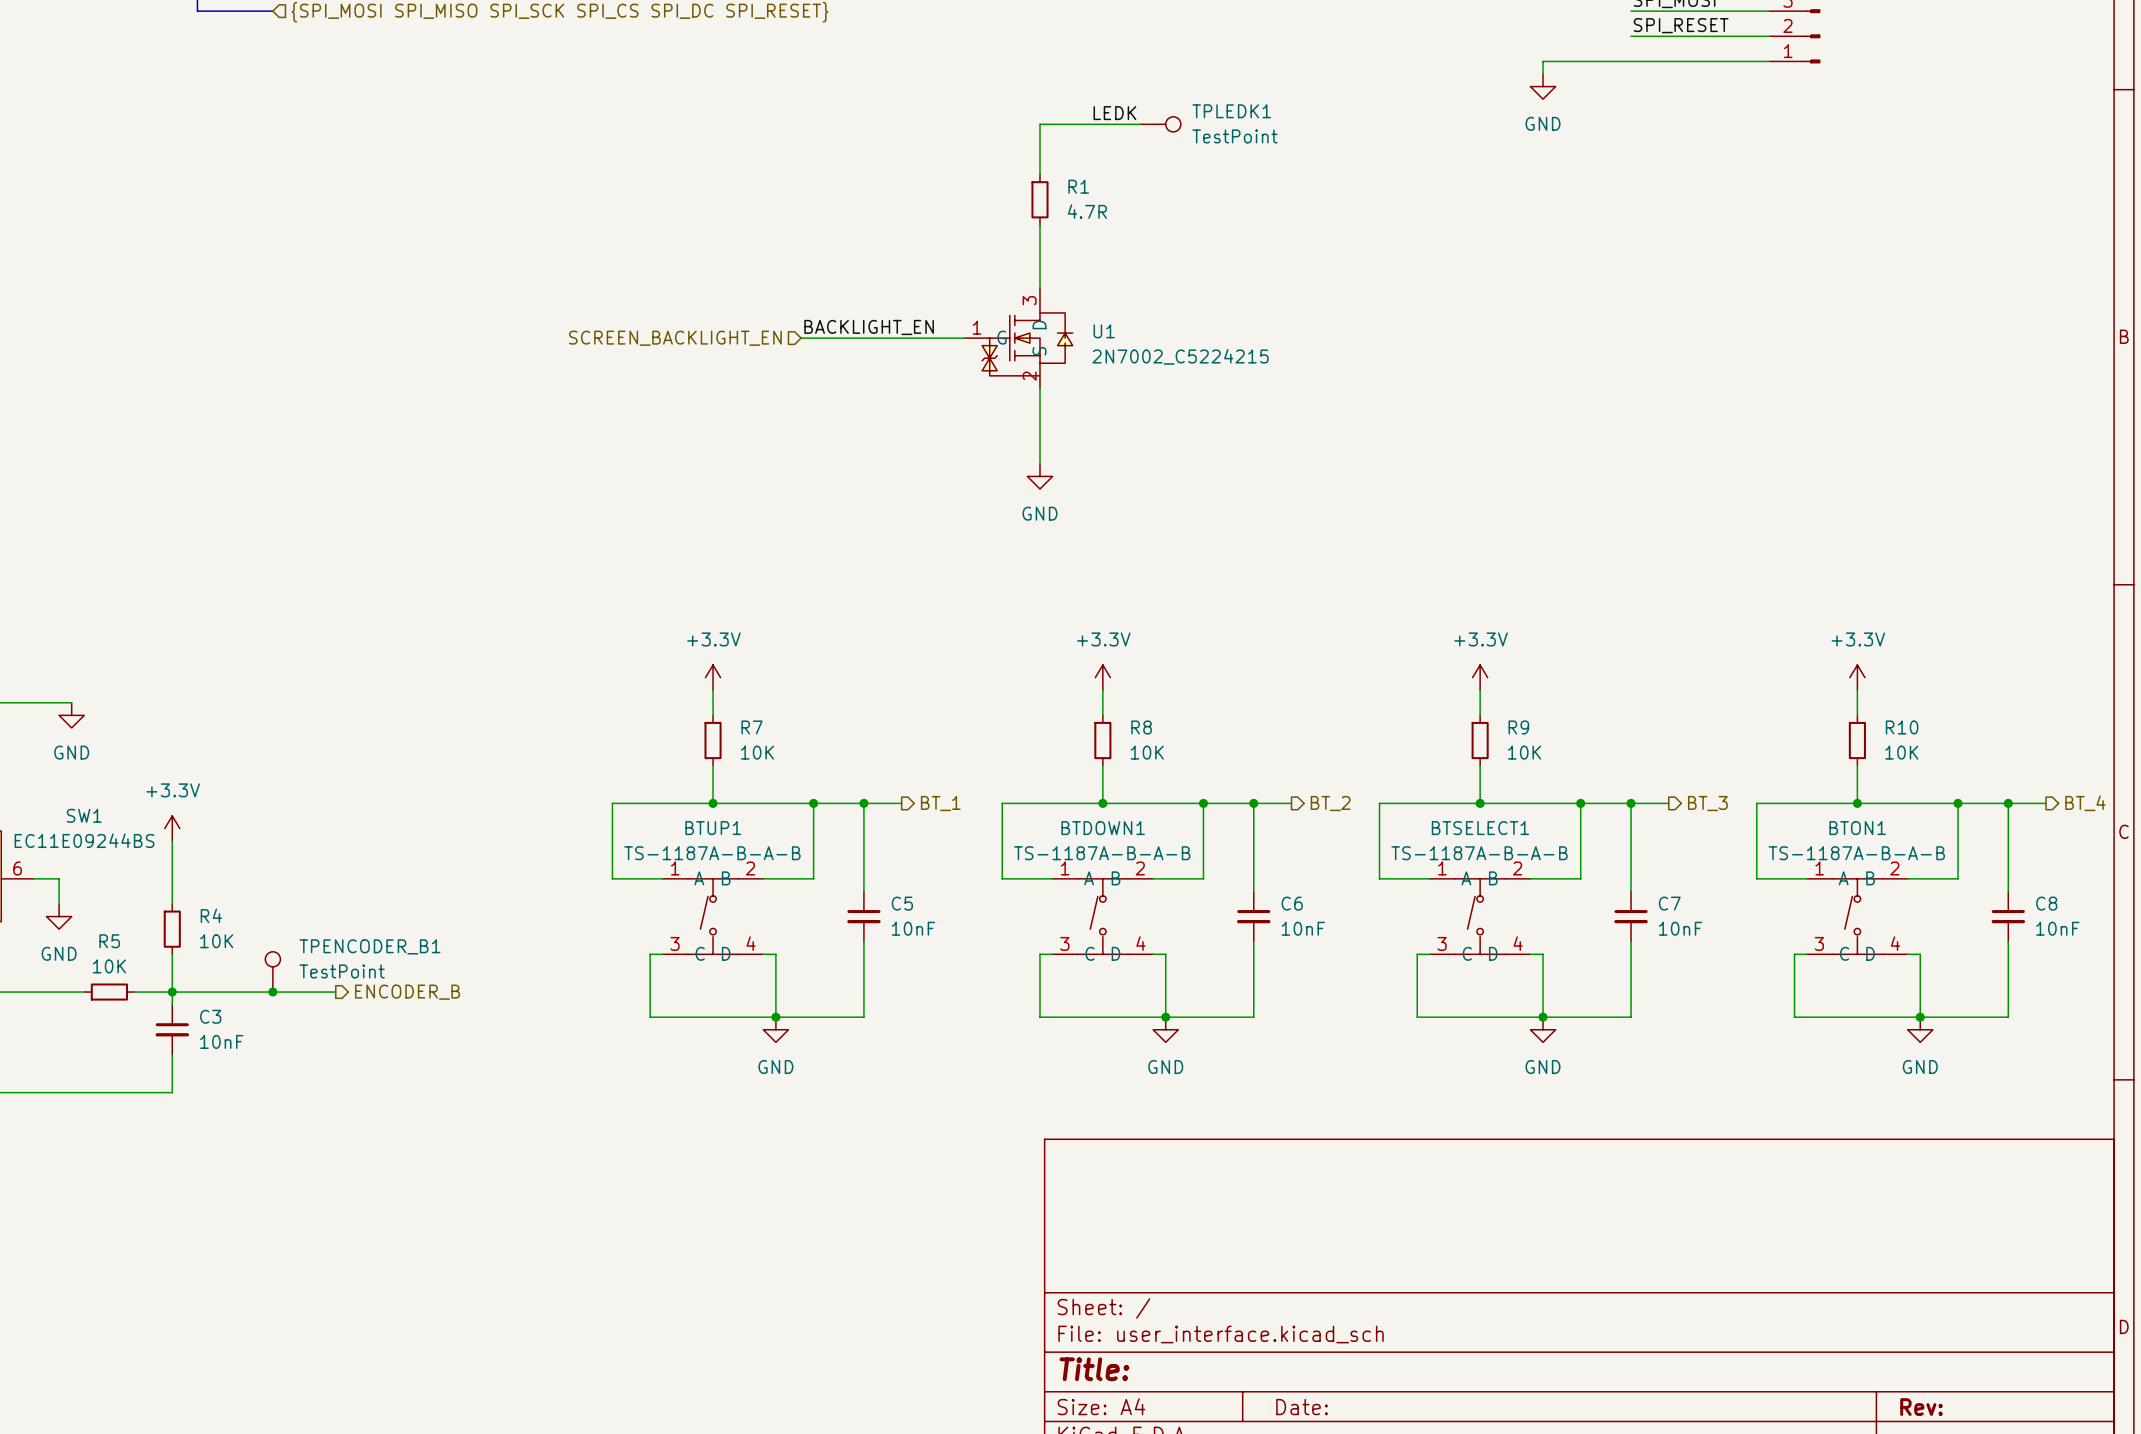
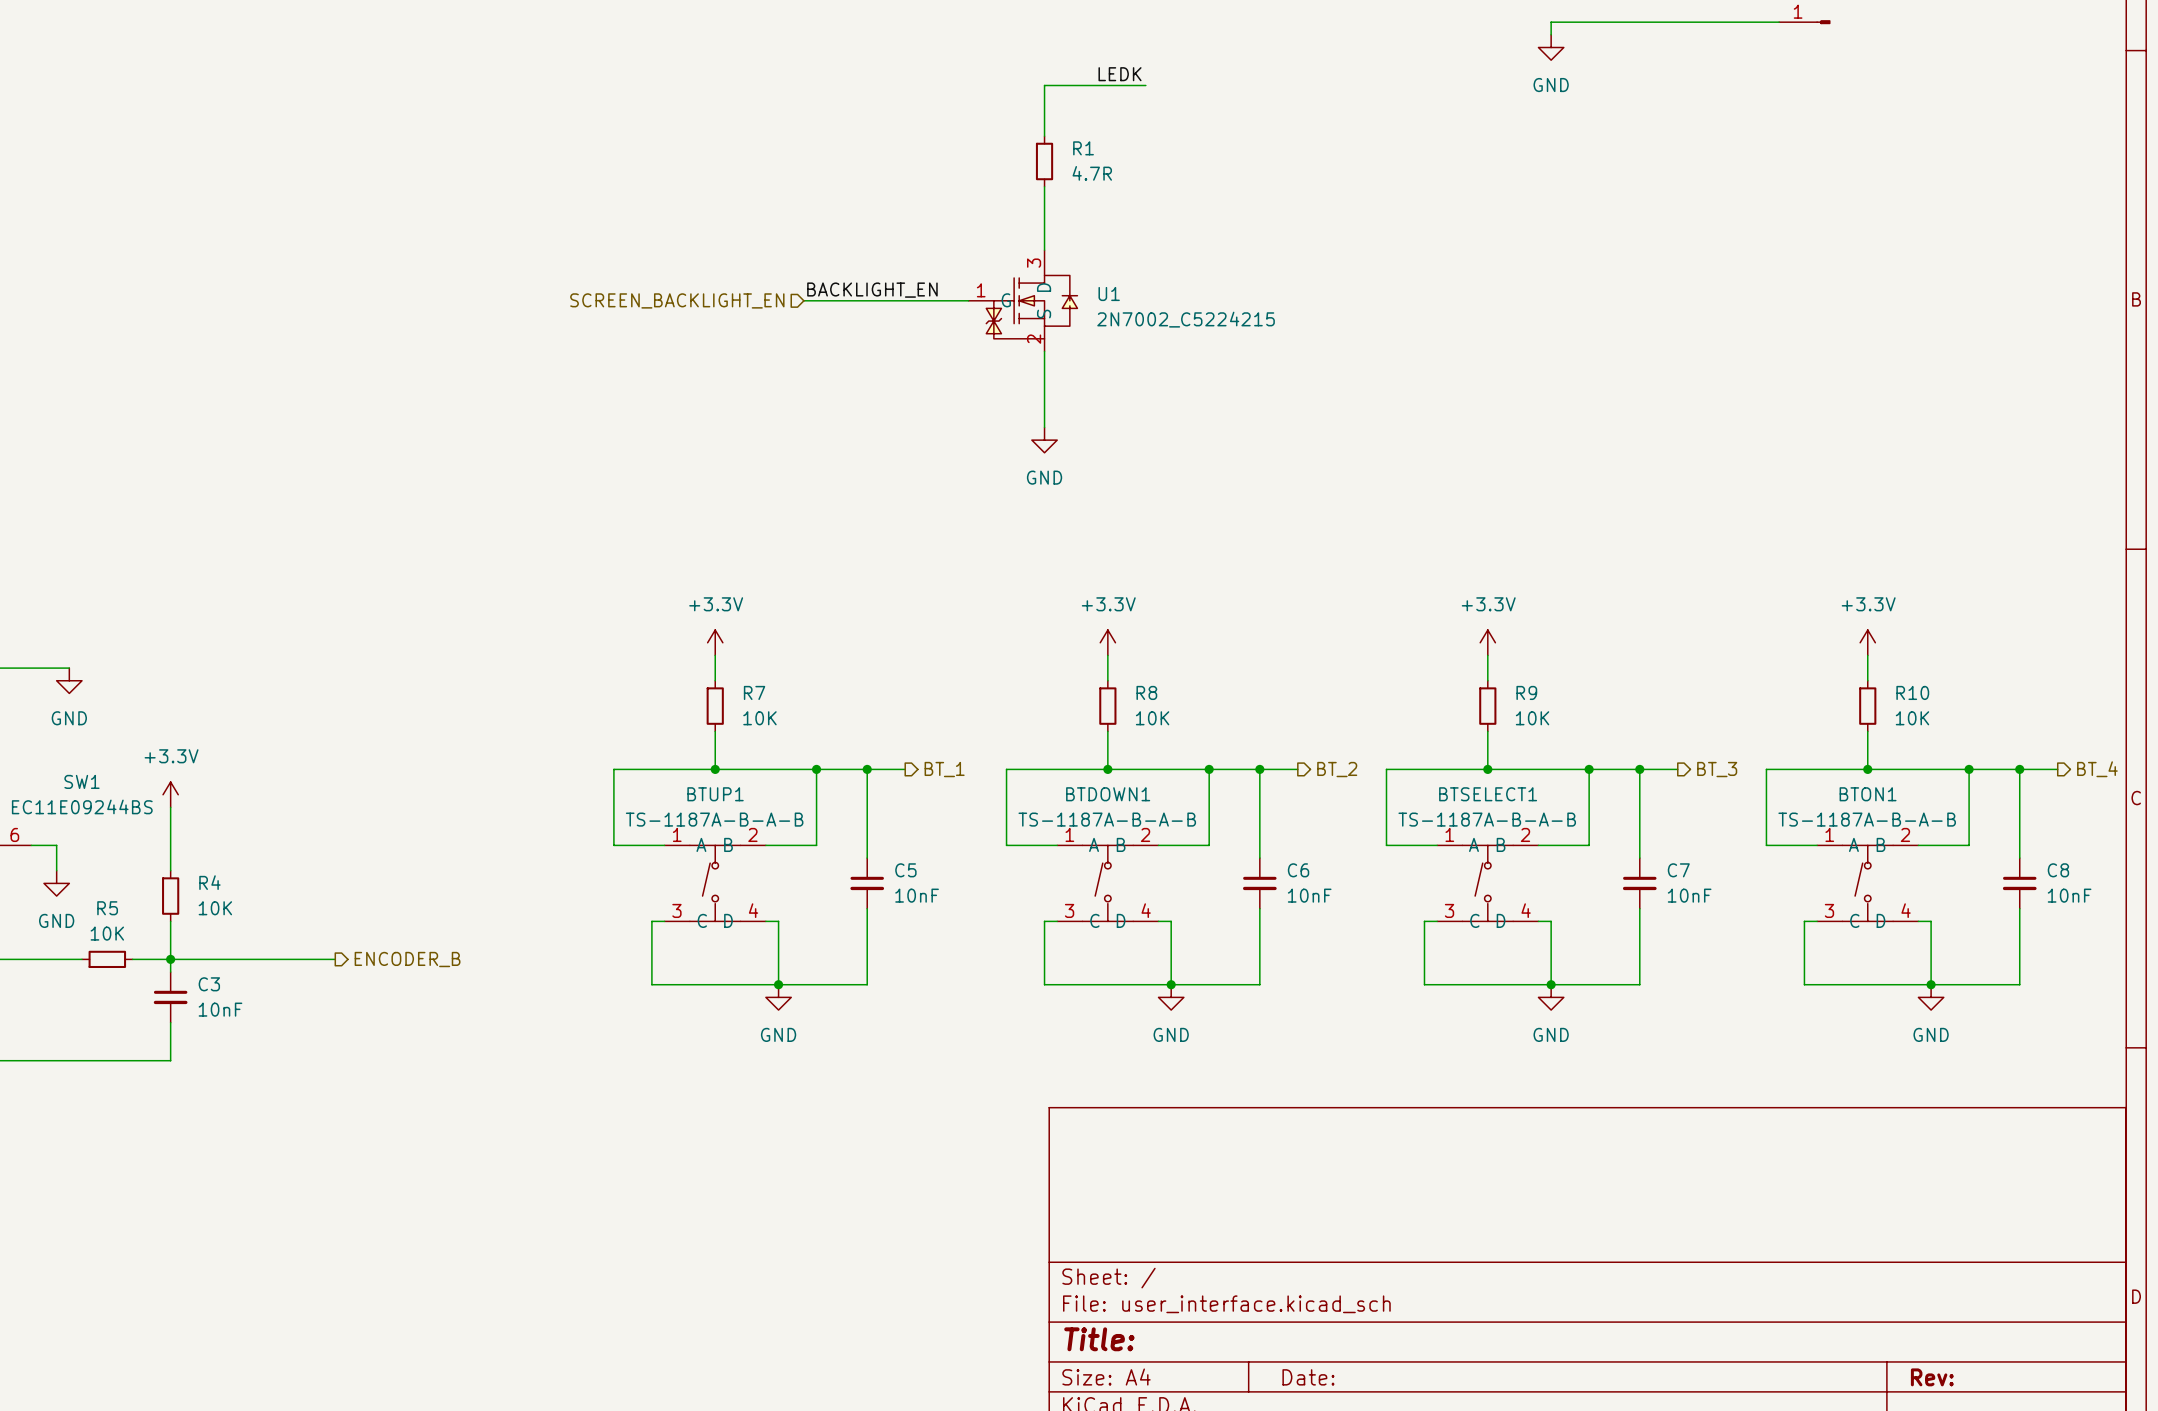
TPLEDK1: TestPoint (1160, 124) -> none
TPENCODER_B1: TestPoint (272, 971) -> none
junction: (272, 992) -> none

